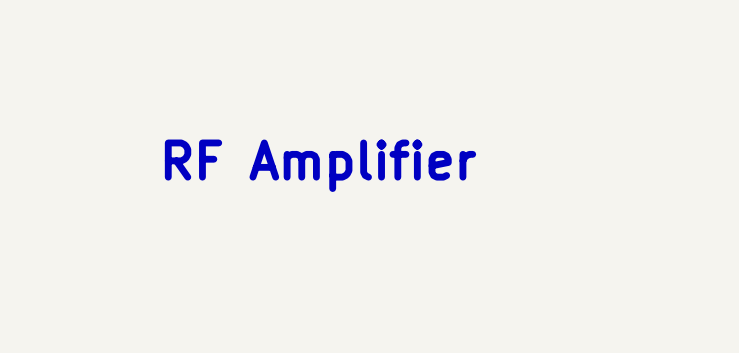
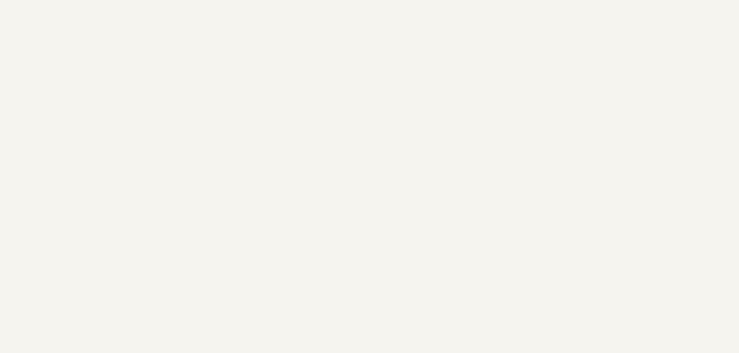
text: RF Amplifier (320, 165) -> none

